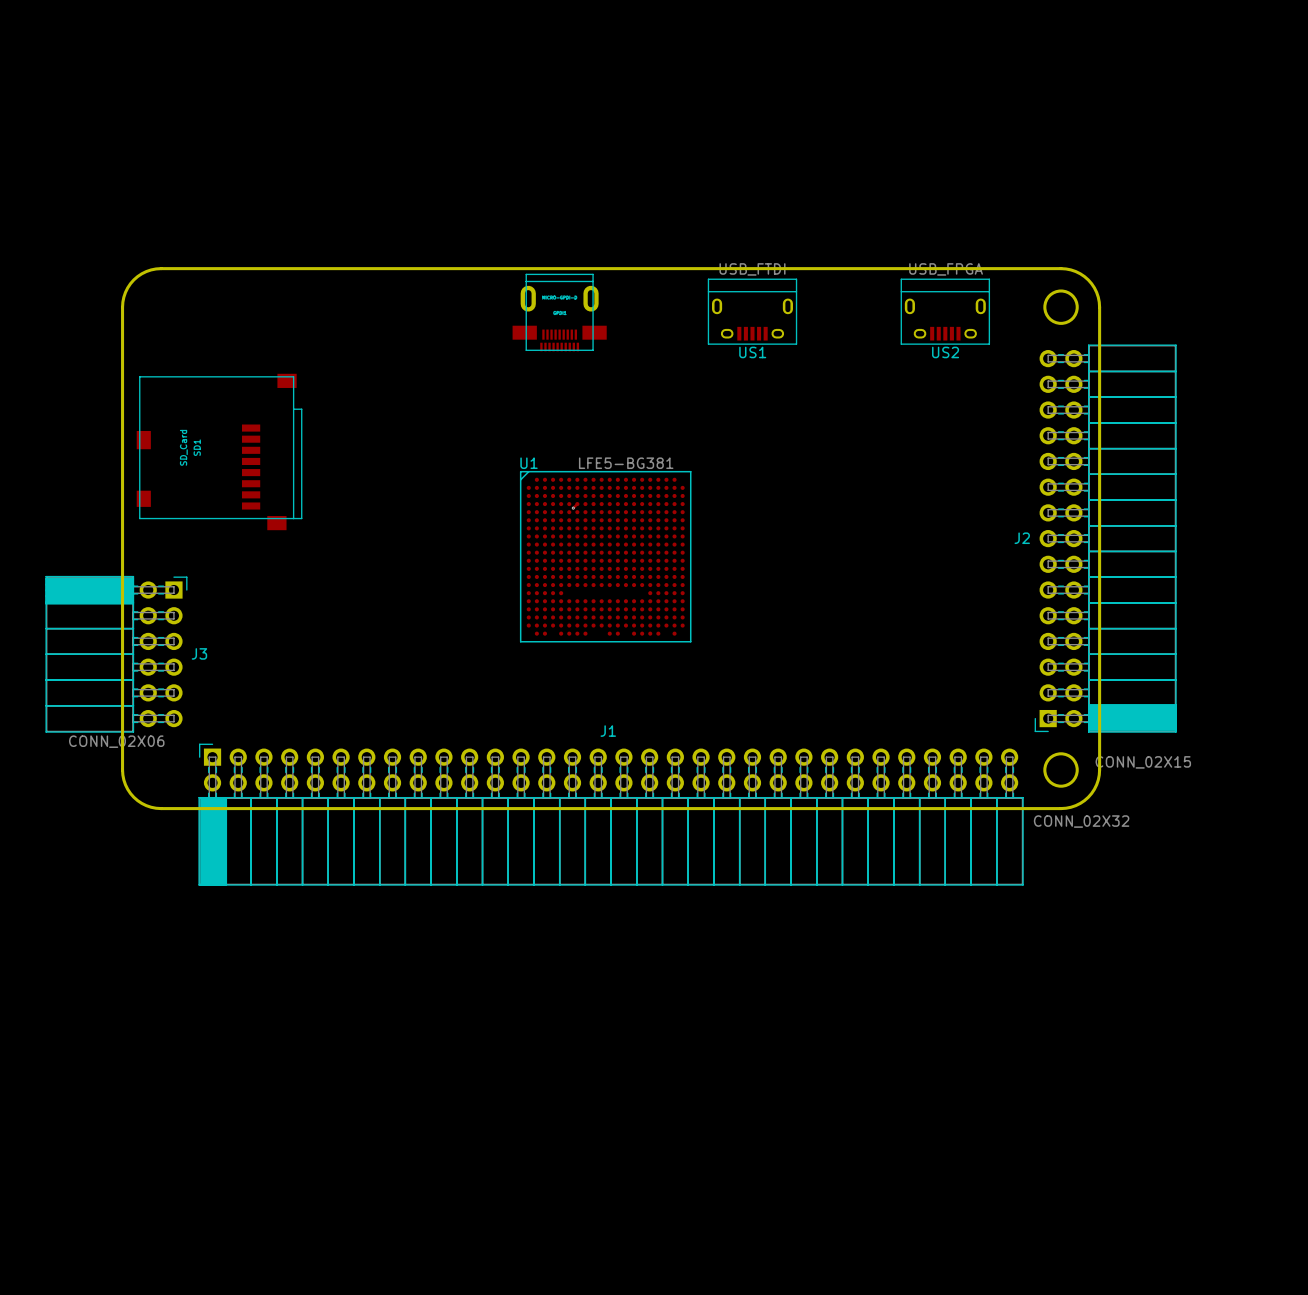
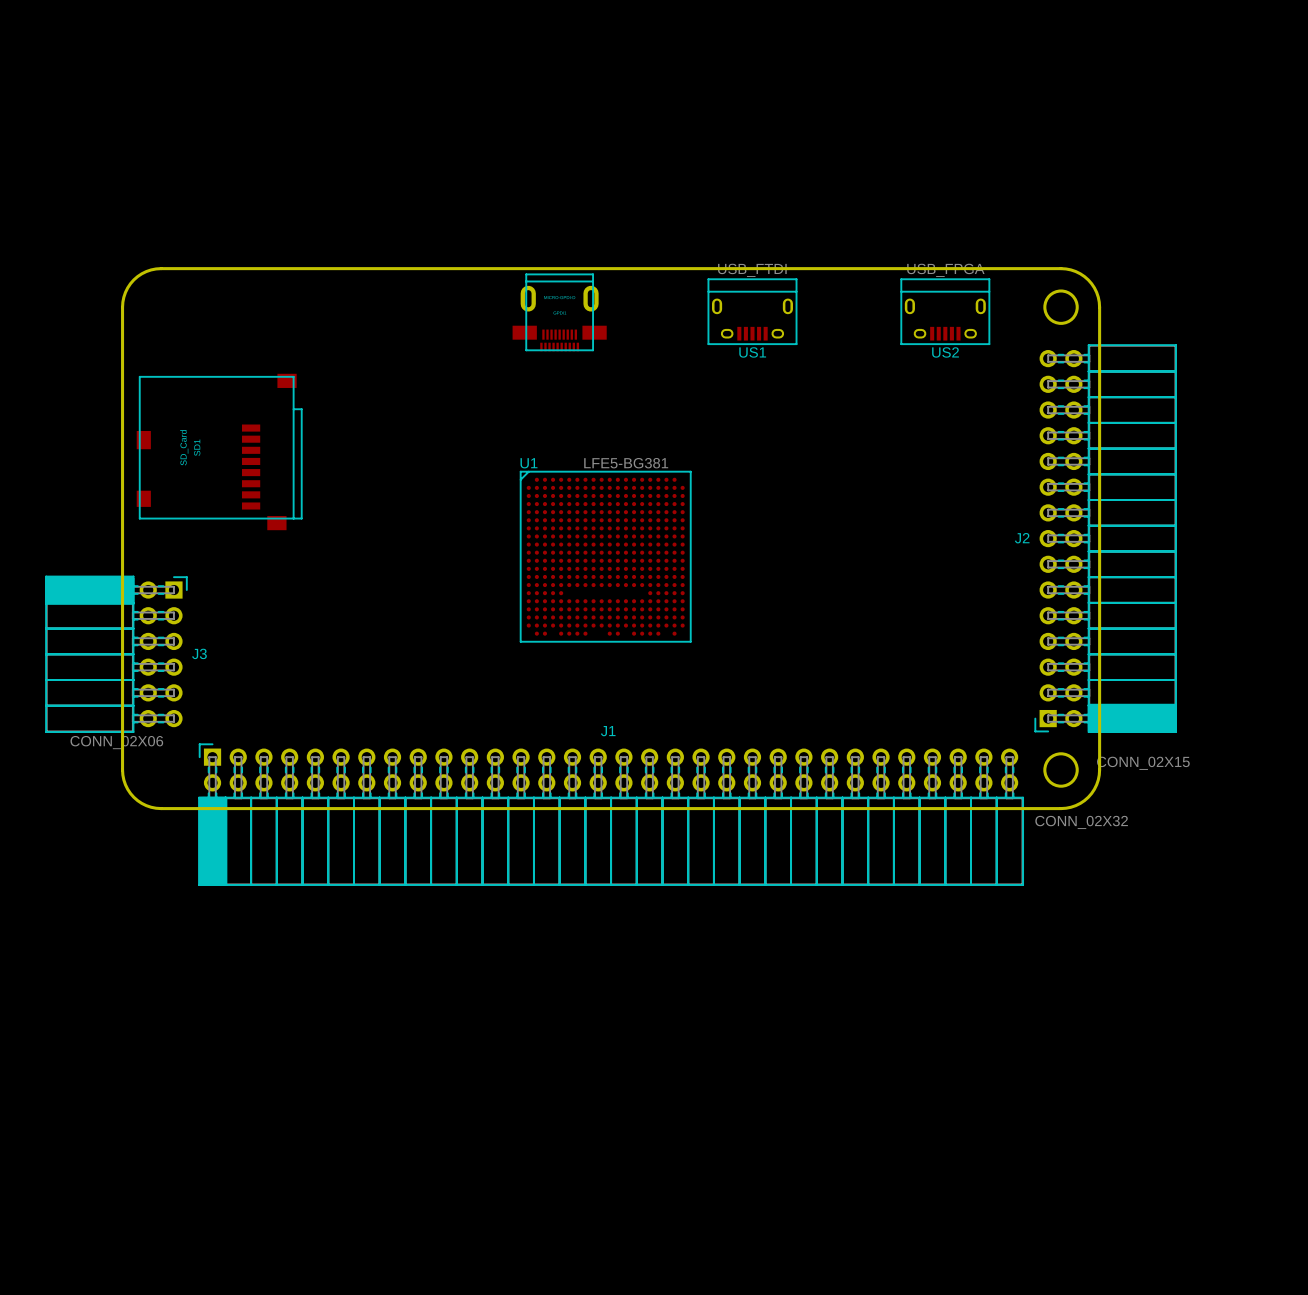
track: (577, 504) (573, 508) -> none
via: (573, 508) -> none

